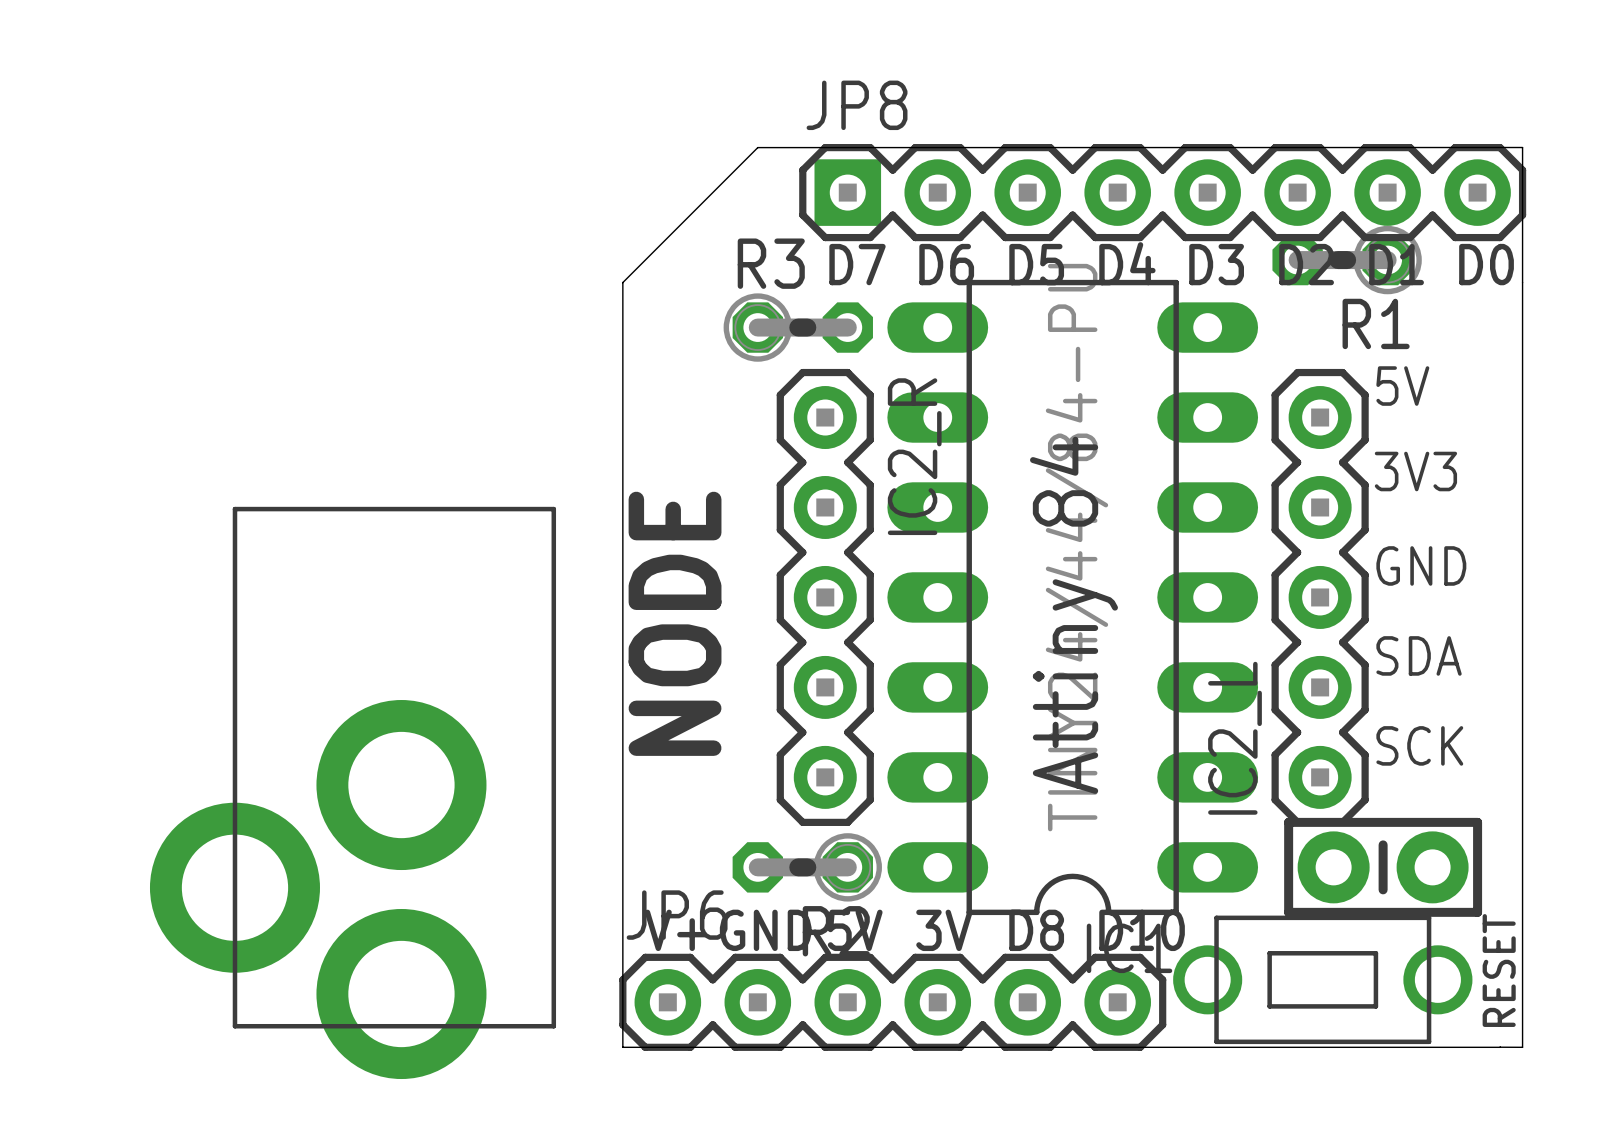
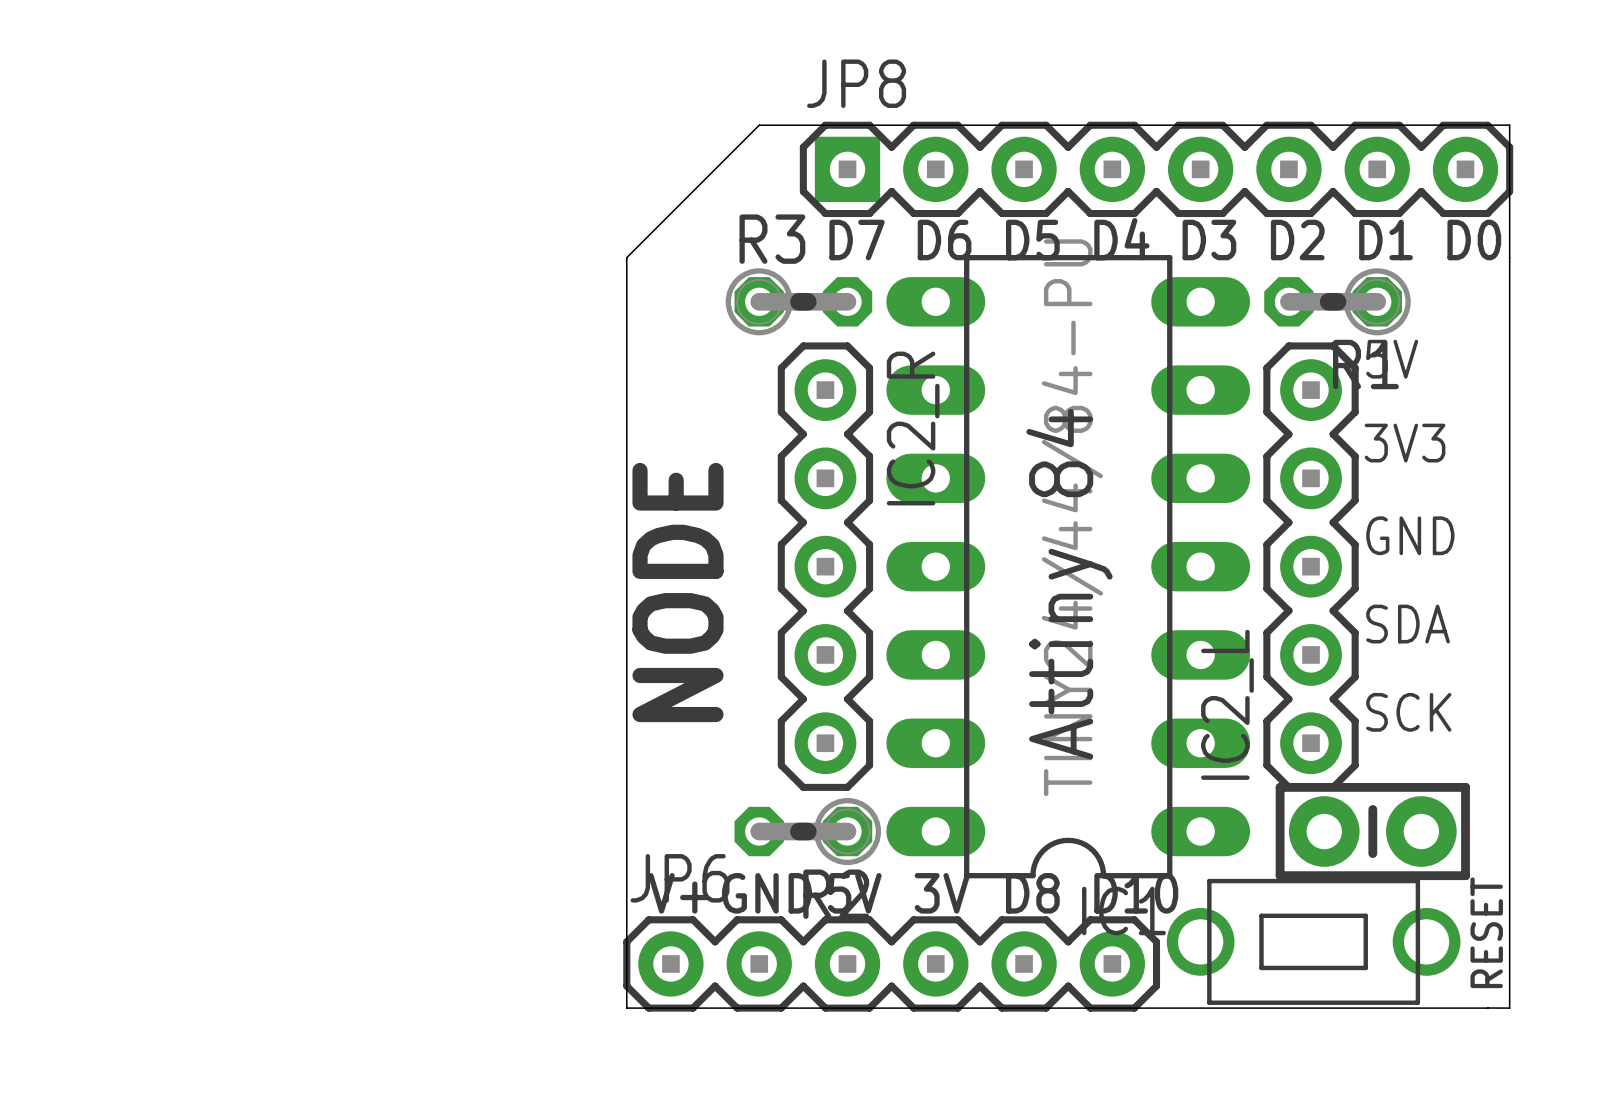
R1 position: (1347, 260) -> (1337, 301)
part: (353, 792) -> none

